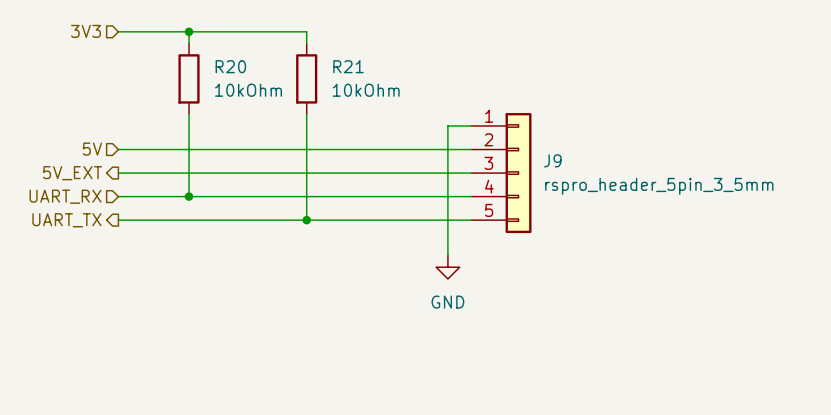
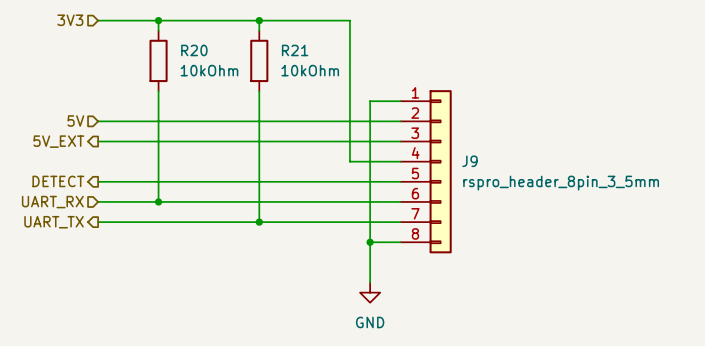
junction: none -> (259, 20)
J9 symbol: [471, 113, 532, 234] -> [400, 90, 452, 254]
wire: (447, 125) (447, 255) -> (380, 101) (370, 101) (370, 282)
J9 value: rspro_header_5pin_3_5mm (659, 186) -> rspro_header_8pin_3_5mm (561, 183)
hierarchical label position: UART_RX (65, 196) -> UART_RX (52, 202)
wire: (118, 196) (412, 196) -> (259, 20) (349, 20) (349, 161)
wire: none -> (158, 161) (158, 201)
junction position: (189, 196) -> (158, 201)
hierarchical label: UART_TX (66, 220) -> DETECT (58, 181)
wire: none -> (259, 181) (259, 222)
junction position: (306, 220) -> (259, 222)
wire: none -> (98, 201) (400, 201)
hierarchical label: none -> UART_TX (54, 222)
wire: none -> (98, 222) (400, 222)
power symbol position: GND (447, 267) -> GND (370, 292)
wire: none -> (370, 242) (400, 242)
junction: none -> (370, 242)

